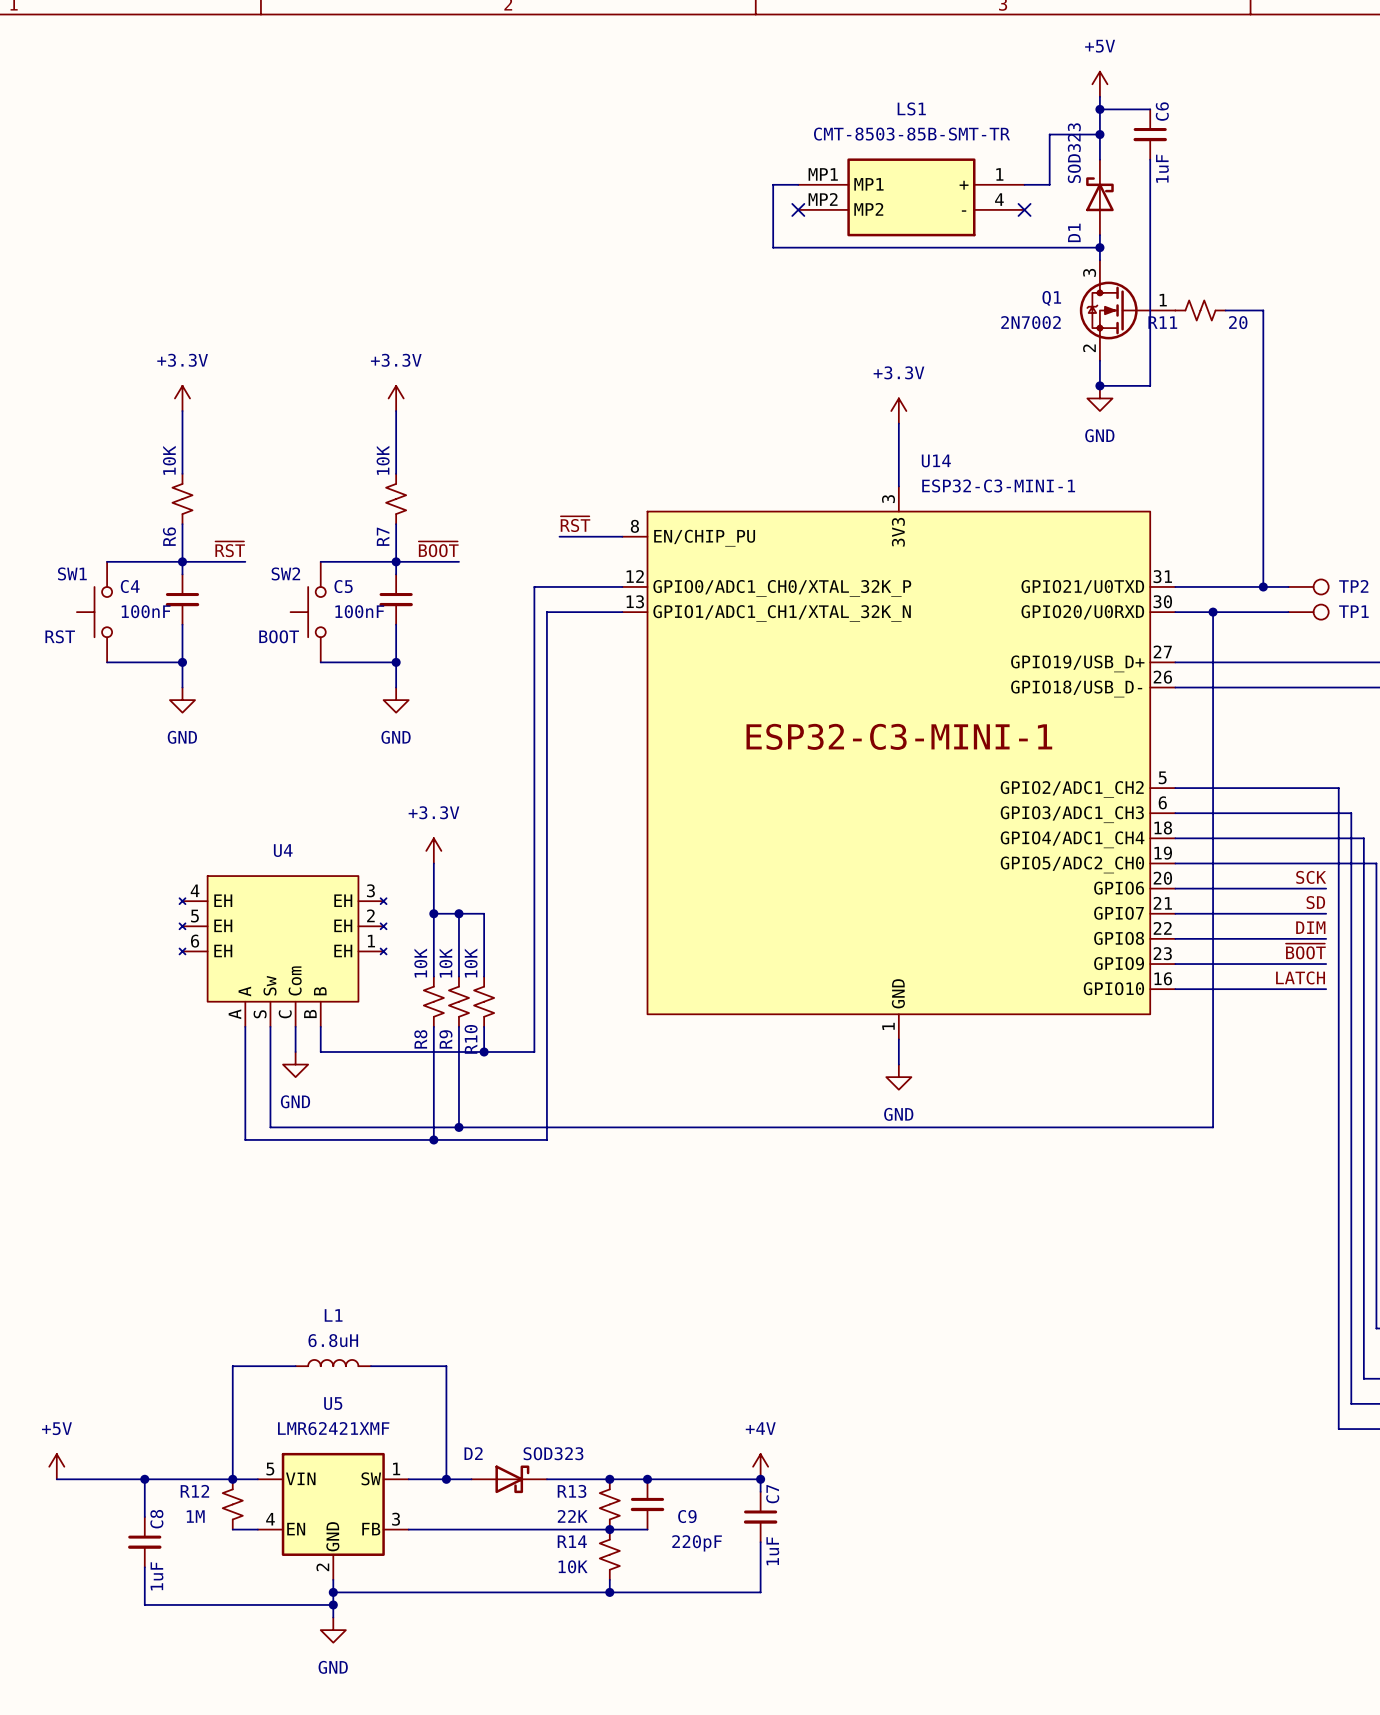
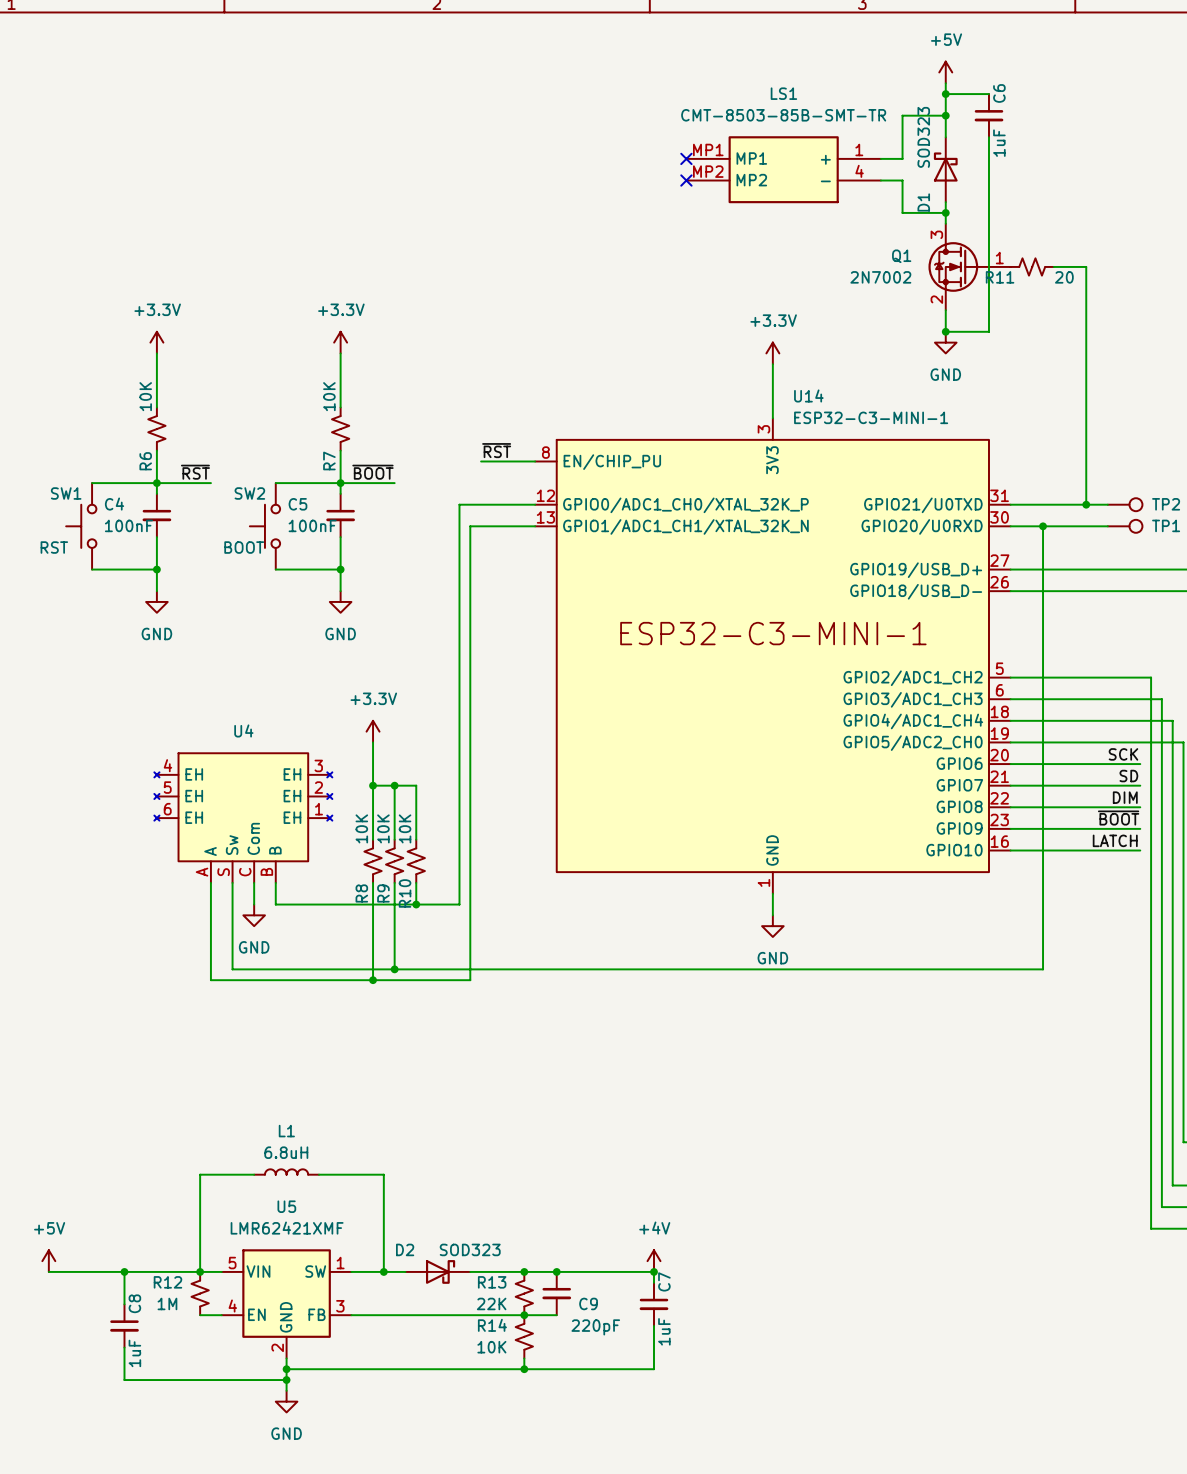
wire: (798, 184) (773, 184) (773, 247) (1049, 247) -> (880, 180) (902, 180) (902, 212)
no-connect mark: none -> (686, 158)
no-connect mark: (1024, 209) -> none

